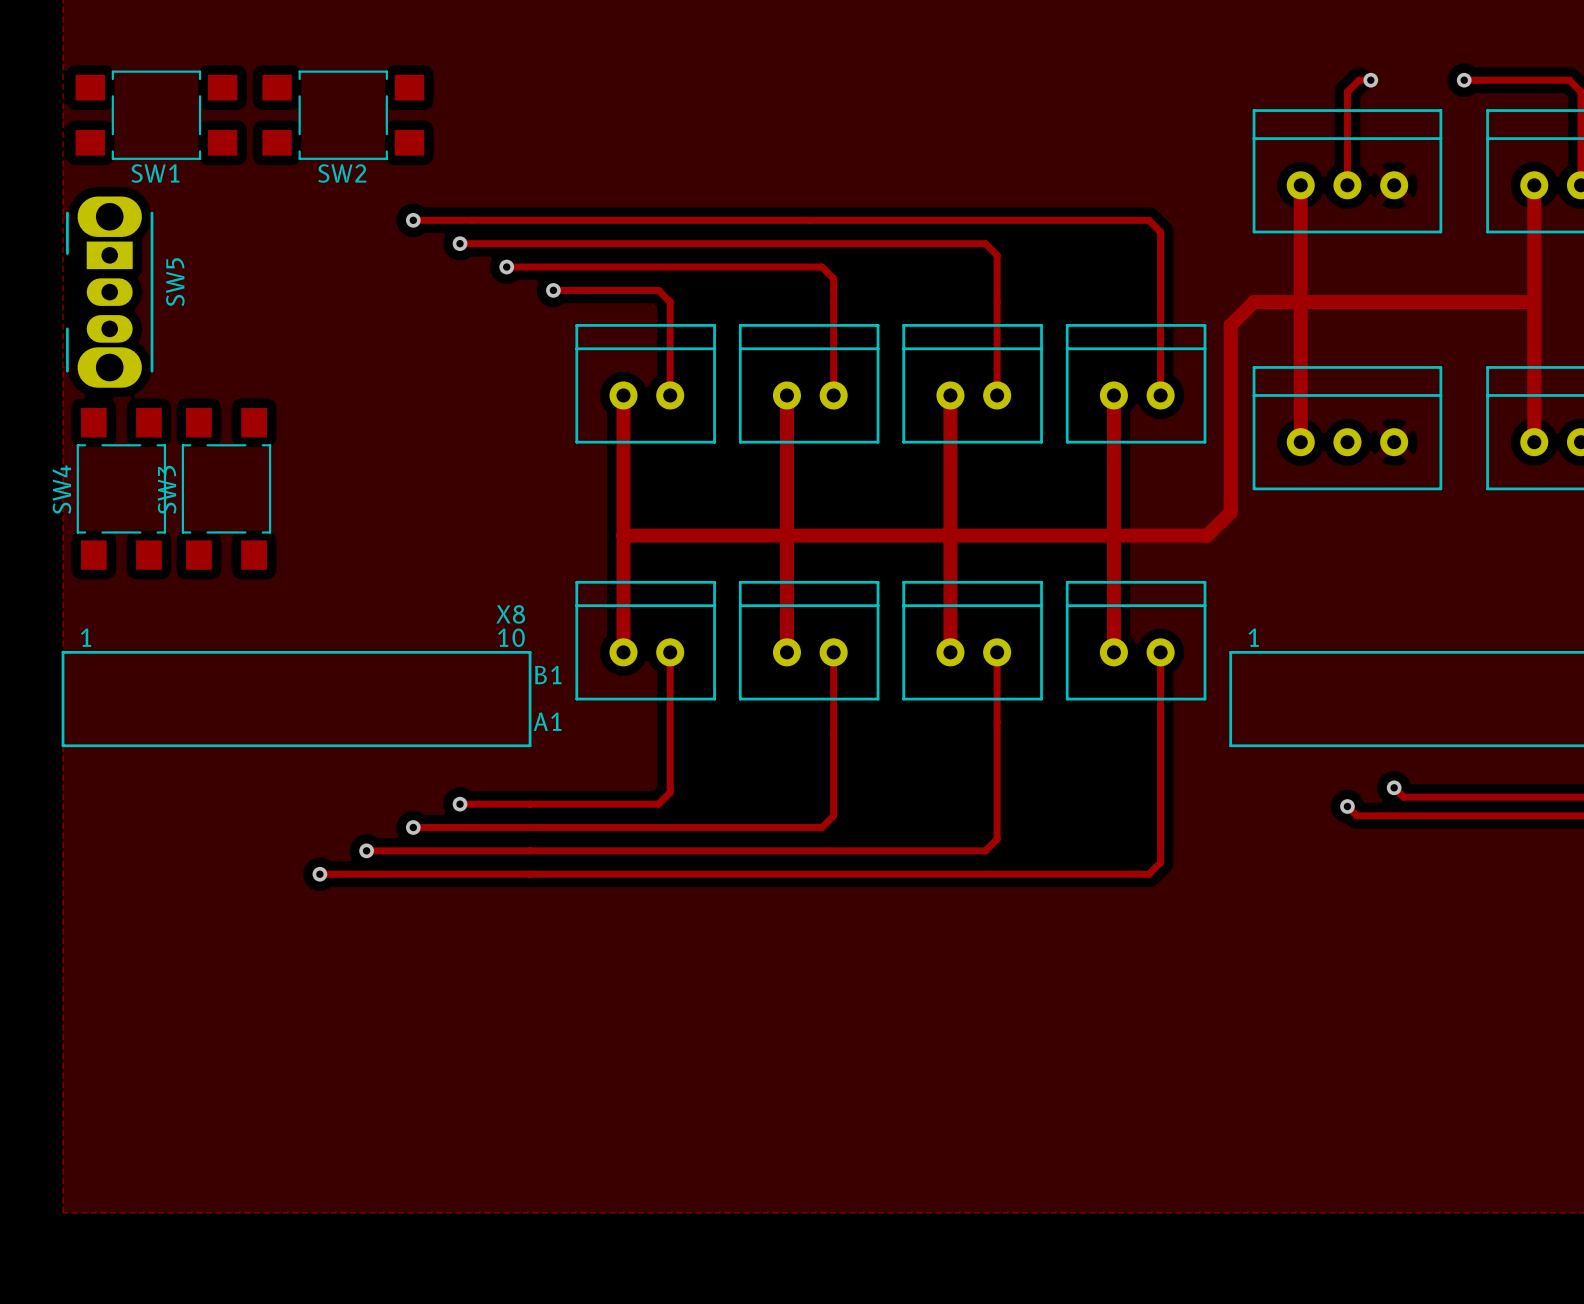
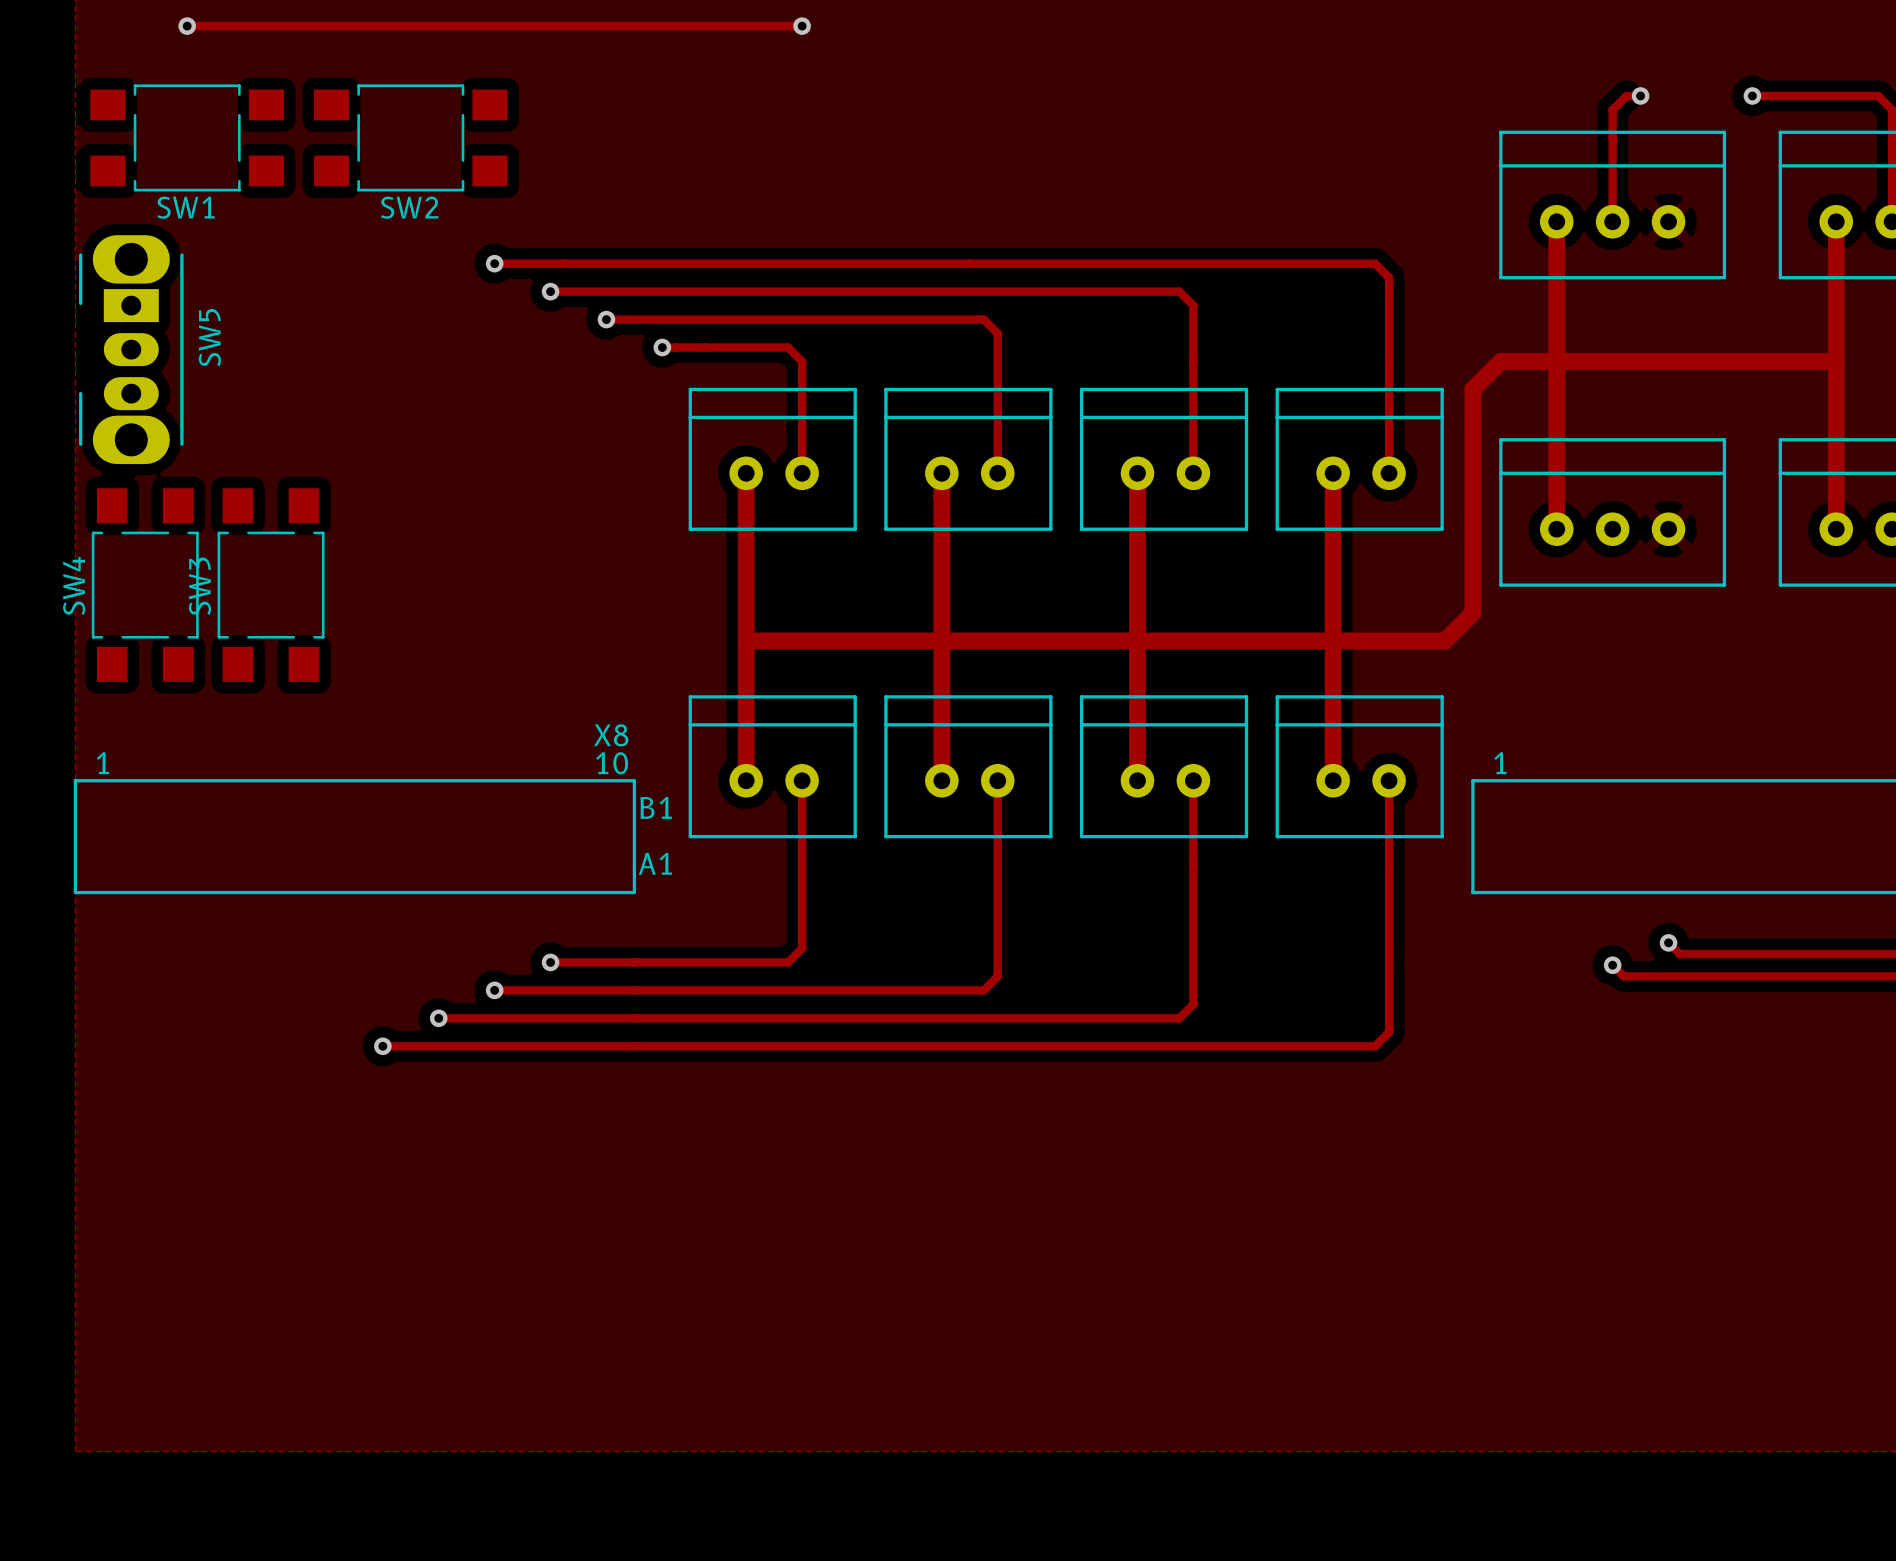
track: none -> (187, 26) (802, 26)
via: none -> (187, 26)
via: none -> (802, 26)

